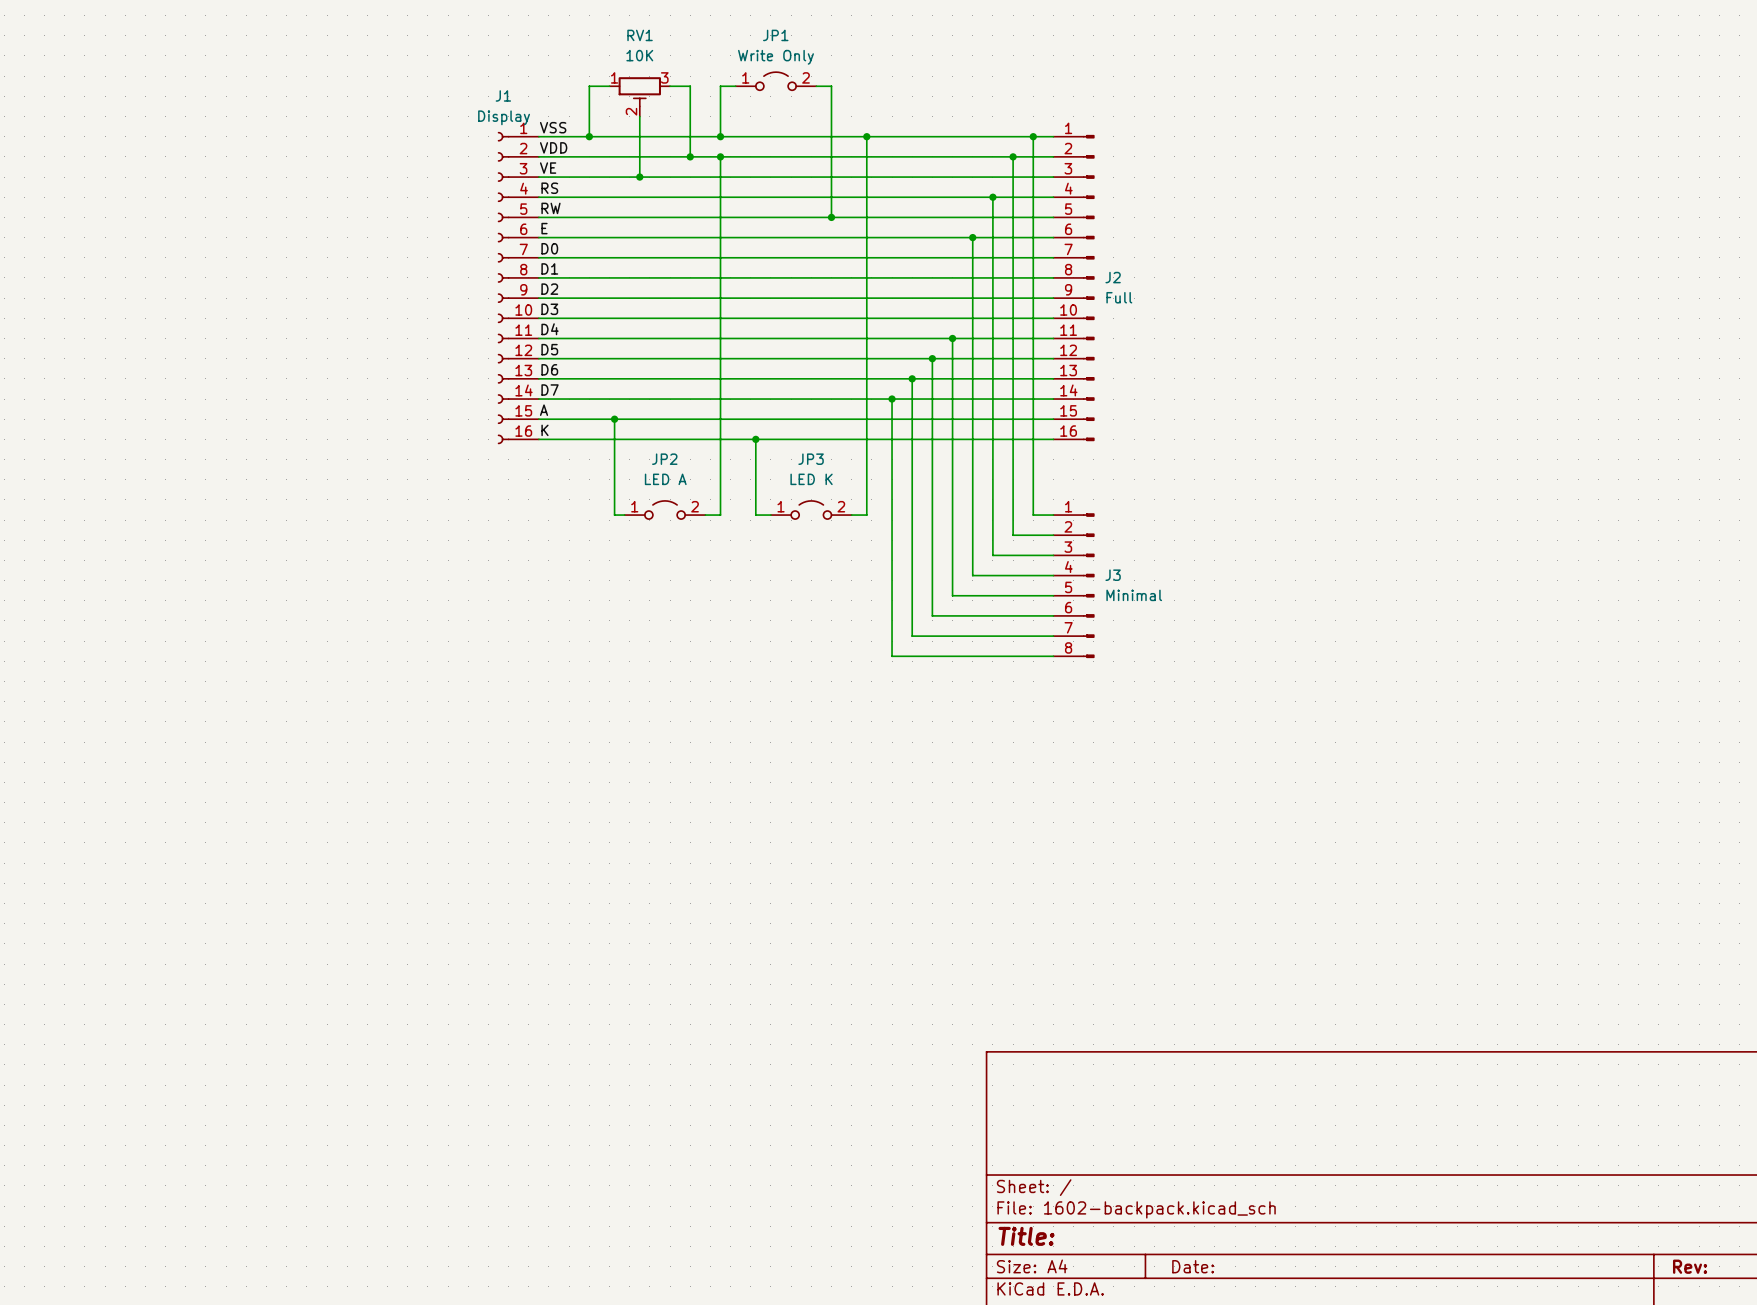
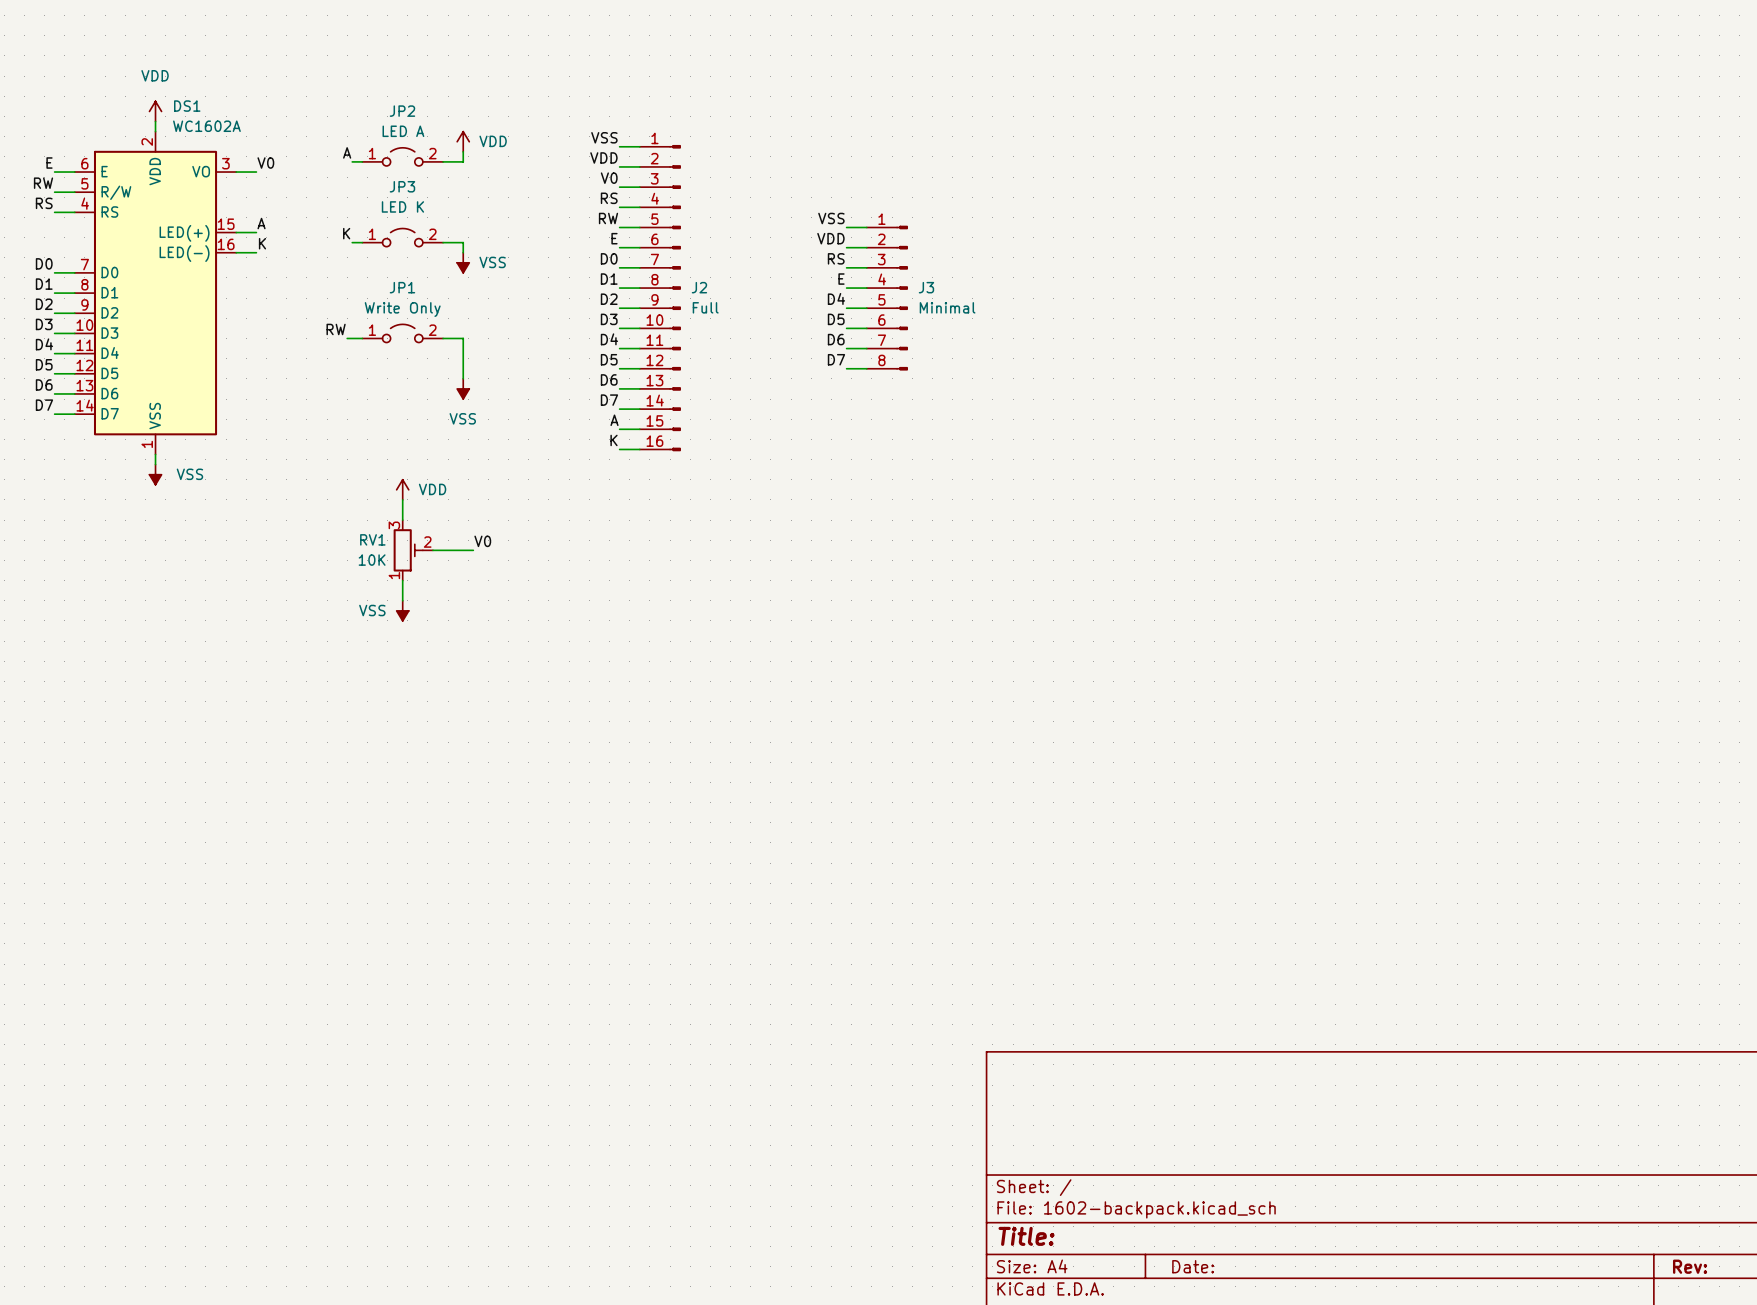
RV1 name position: RV1 (640, 35) -> RV1 (372, 539)
JP1 position: (776, 81) -> (402, 333)
wire: (609, 86) (589, 86) (589, 136) -> none
wire: (670, 86) (690, 86) (690, 156) -> none
wire: (735, 86) (720, 86) (720, 136) -> none
wire: (816, 86) (831, 86) (831, 217) -> none
RV1 rotation: 0° (639, 91) -> 90° counterclockwise (408, 550)
RV1 position: (639, 96) -> (413, 550)
power symbol: none -> VDD (155, 111)
wire: (639, 116) (639, 177) -> none
wire: none -> (155, 121) (155, 131)
label position: VSS (553, 127) -> VSS (604, 137)
wire: (538, 136) (1053, 136) -> none
junction: (589, 136) -> none
junction: (720, 136) -> none
wire: (866, 136) (866, 515) (851, 515) -> none
junction: (866, 136) -> none
wire: (1033, 136) (1033, 515) (1053, 515) -> none
junction: (1033, 136) -> none
power symbol: none -> VDD (463, 141)
wire: none -> (619, 146) (639, 146)
label position: VDD (553, 147) -> VDD (603, 157)
wire: none -> (463, 151) (463, 161) (443, 161)
label: none -> A (347, 152)
wire: (538, 156) (1053, 156) -> none
junction: (690, 156) -> none
wire: (720, 156) (720, 515) (705, 515) -> none
junction: (720, 156) -> none
wire: (1013, 156) (1013, 535) (1053, 535) -> none
junction: (1013, 156) -> none
wire: none -> (352, 161) (362, 161)
label: none -> E (49, 163)
label: none -> V0 (265, 163)
wire: none -> (619, 166) (639, 166)
label: VE (548, 168) -> none
wire: none -> (54, 172) (74, 172)
wire: none -> (236, 172) (256, 172)
wire: (538, 177) (1053, 177) -> none
junction: (639, 177) -> none
label: none -> V0 (609, 178)
label: none -> RW (43, 183)
wire: none -> (619, 187) (639, 187)
label position: RS (549, 188) -> RS (609, 198)
wire: none -> (54, 192) (74, 192)
wire: (538, 197) (1053, 197) -> none
wire: (992, 197) (992, 555) (1053, 555) -> none
junction: (992, 197) -> none
label: none -> RS (44, 203)
wire: none -> (619, 207) (639, 207)
label position: RW (550, 208) -> RW (608, 218)
wire: none -> (54, 212) (74, 212)
wire: (538, 217) (1053, 217) -> none
junction: (831, 217) -> none
label: none -> VSS (831, 218)
label: none -> A (261, 223)
wire: none -> (619, 227) (639, 227)
wire: none -> (846, 227) (866, 227)
label position: E (544, 228) -> E (614, 238)
wire: none -> (236, 232) (256, 232)
label: none -> K (346, 233)
wire: (538, 237) (1053, 237) -> none
wire: (972, 237) (972, 575) (1053, 575) -> none
junction: (972, 237) -> none
label: none -> VDD (830, 238)
wire: none -> (352, 242) (362, 242)
wire: none -> (443, 242) (463, 242) (463, 252)
label: none -> K (262, 243)
wire: none -> (619, 247) (639, 247)
wire: none -> (846, 247) (866, 247)
label position: D0 (549, 248) -> D0 (609, 258)
wire: none -> (236, 252) (256, 252)
wire: (538, 257) (1053, 257) -> none
label: none -> RS (836, 258)
power symbol: none -> VSS (463, 262)
label: none -> D0 (44, 263)
wire: none -> (619, 267) (639, 267)
wire: none -> (846, 267) (866, 267)
label position: D1 (549, 268) -> D1 (609, 279)
wire: none -> (54, 272) (74, 272)
wire: (538, 277) (1053, 277) -> none
label: none -> E (841, 279)
label: none -> D1 (44, 284)
J1: Display (518, 288) -> none
wire: none -> (619, 288) (639, 288)
wire: none -> (846, 288) (866, 288)
J2 position: (1073, 288) -> (660, 298)
label position: D2 (549, 289) -> D2 (609, 299)
wire: none -> (54, 293) (74, 293)
DS1: none -> WC1602A (155, 293)
wire: (538, 298) (1053, 298) -> none
label: none -> D4 (836, 298)
label: none -> D2 (44, 304)
wire: none -> (619, 308) (639, 308)
wire: none -> (846, 308) (866, 308)
label position: D3 (549, 309) -> D3 (609, 319)
wire: none -> (54, 313) (74, 313)
wire: (538, 318) (1053, 318) -> none
label: none -> D5 (836, 319)
label: none -> D3 (44, 324)
wire: none -> (619, 328) (639, 328)
wire: none -> (846, 328) (866, 328)
label: none -> RW (336, 329)
label position: D4 (550, 329) -> D4 (609, 339)
wire: none -> (54, 333) (74, 333)
wire: none -> (347, 338) (362, 338)
wire: none -> (443, 338) (463, 338) (463, 378)
wire: (538, 338) (1053, 338) -> none
wire: (952, 338) (952, 595) (1053, 595) -> none
junction: (952, 338) -> none
label: none -> D6 (836, 339)
label: none -> D4 (44, 344)
wire: none -> (619, 348) (639, 348)
wire: none -> (846, 348) (866, 348)
label position: D5 (549, 349) -> D5 (609, 359)
wire: none -> (54, 353) (74, 353)
wire: (538, 358) (1053, 358) -> none
wire: (932, 358) (932, 615) (1053, 615) -> none
junction: (932, 358) -> none
label: none -> D7 (836, 359)
label: none -> D5 (44, 364)
wire: none -> (619, 368) (639, 368)
wire: none -> (846, 368) (866, 368)
label position: D6 (549, 369) -> D6 (609, 379)
wire: none -> (54, 373) (74, 373)
wire: (538, 378) (1053, 378) -> none
wire: (912, 378) (912, 636) (1053, 636) -> none
junction: (912, 378) -> none
label: none -> D6 (44, 384)
power symbol: none -> VSS (463, 388)
wire: none -> (619, 388) (639, 388)
label position: D7 (550, 390) -> D7 (609, 400)
wire: none -> (54, 393) (74, 393)
wire: (538, 399) (1053, 399) -> none
wire: (892, 399) (892, 656) (1053, 656) -> none
junction: (892, 399) -> none
label: none -> D7 (44, 405)
wire: none -> (619, 409) (639, 409)
label position: A (544, 410) -> A (614, 420)
wire: none -> (54, 414) (74, 414)
wire: (538, 419) (1053, 419) -> none
wire: (614, 419) (614, 515) (624, 515) -> none
junction: (614, 419) -> none
wire: none -> (619, 429) (639, 429)
label position: K (544, 430) -> K (614, 440)
wire: (538, 439) (1053, 439) -> none
wire: (755, 439) (755, 515) (770, 515) -> none
junction: (755, 439) -> none
wire: none -> (619, 449) (639, 449)
wire: none -> (155, 454) (155, 464)
JP2 name position: JP2 (664, 459) -> JP2 (402, 111)
power symbol: none -> VSS (155, 474)
JP2 value position: LED A (665, 479) -> LED A (403, 131)
power symbol: none -> VDD (402, 489)
wire: none -> (402, 499) (402, 520)
JP2 position: (665, 510) -> (402, 156)
JP3 position: (811, 510) -> (402, 237)
label: none -> V0 (482, 541)
wire: none -> (432, 550) (473, 550)
wire: none -> (402, 580) (402, 600)
J3 position: (1073, 585) -> (887, 298)
power symbol: none -> VSS (402, 610)

